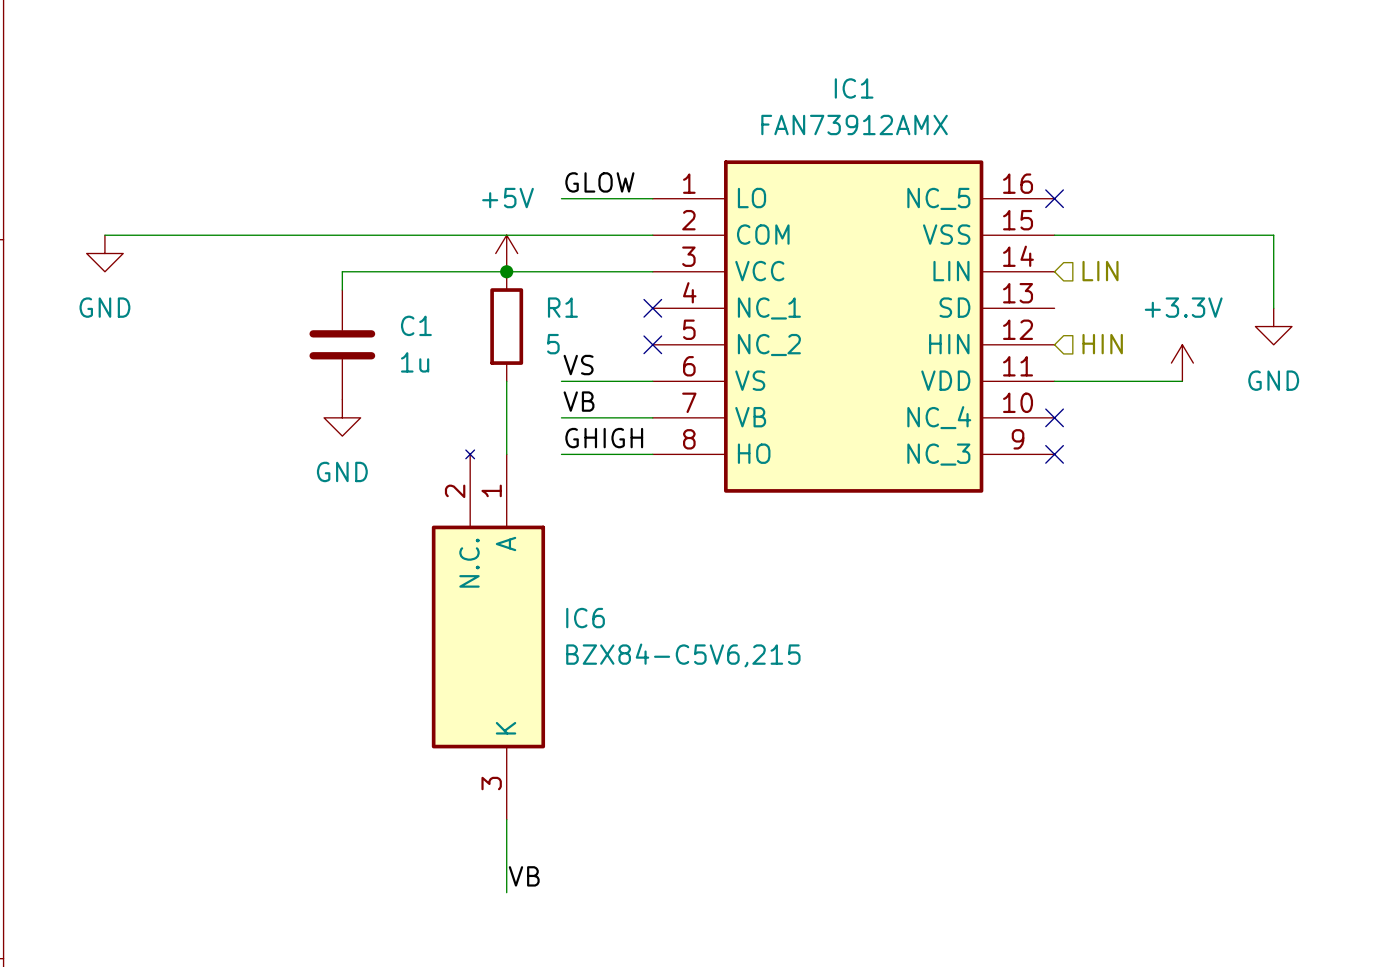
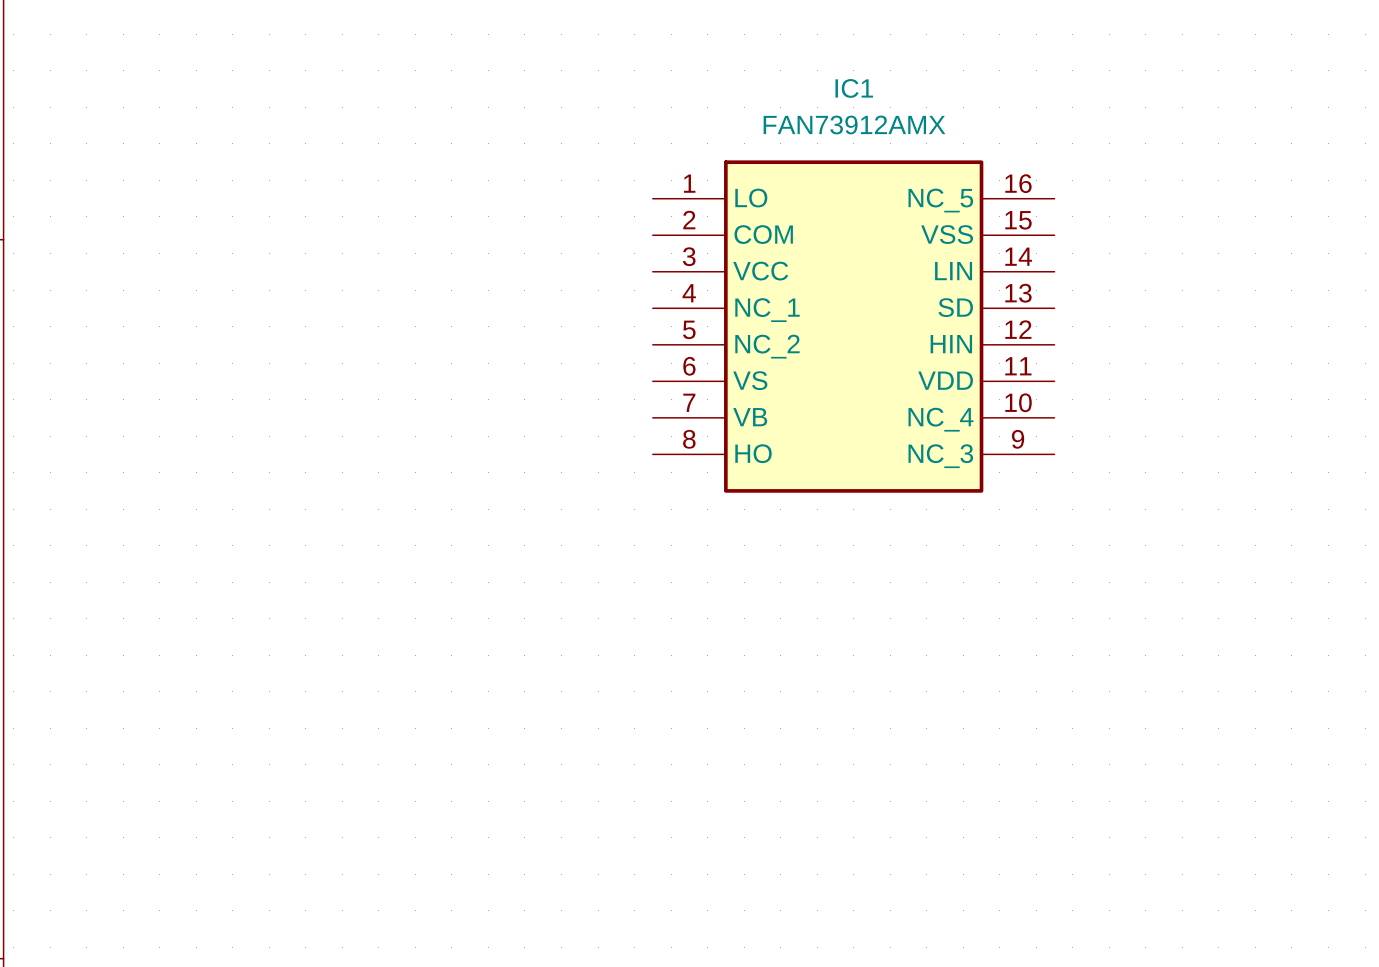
label: GLOW (599, 182) -> none
wire: (561, 198) (652, 198) -> none
no-connect mark: (1054, 198) -> none
wire: (104, 235) (652, 235) -> none
wire: (1054, 235) (1273, 235) (1273, 308) -> none
power symbol: GND (104, 253) -> none
power symbol: +5V (506, 253) -> none
junction: (506, 271) -> none
wire: (652, 271) (342, 271) (342, 290) -> none
hierarchical label: LIN (1100, 271) -> none
no-connect mark: (652, 308) -> none
R1: 5 (506, 326) -> none
power symbol: GND (1273, 326) -> none
C1: 1u (342, 344) -> none
no-connect mark: (652, 344) -> none
hierarchical label: HIN (1102, 344) -> none
power symbol: +3.3V (1182, 363) -> none
label: VS (578, 365) -> none
wire: (506, 381) (506, 454) -> none
wire: (561, 381) (652, 381) -> none
wire: (1054, 381) (1182, 381) -> none
label: VB (579, 401) -> none
power symbol: GND (342, 417) -> none
wire: (561, 417) (652, 417) -> none
no-connect mark: (1054, 417) -> none
label: GHIGH (604, 438) -> none
wire: (561, 454) (652, 454) -> none
no-connect mark: (1054, 454) -> none
IC6: BZX84-C5V6,215 (488, 634) -> none
wire: (506, 819) (506, 892) -> none
label: VB (524, 876) -> none

